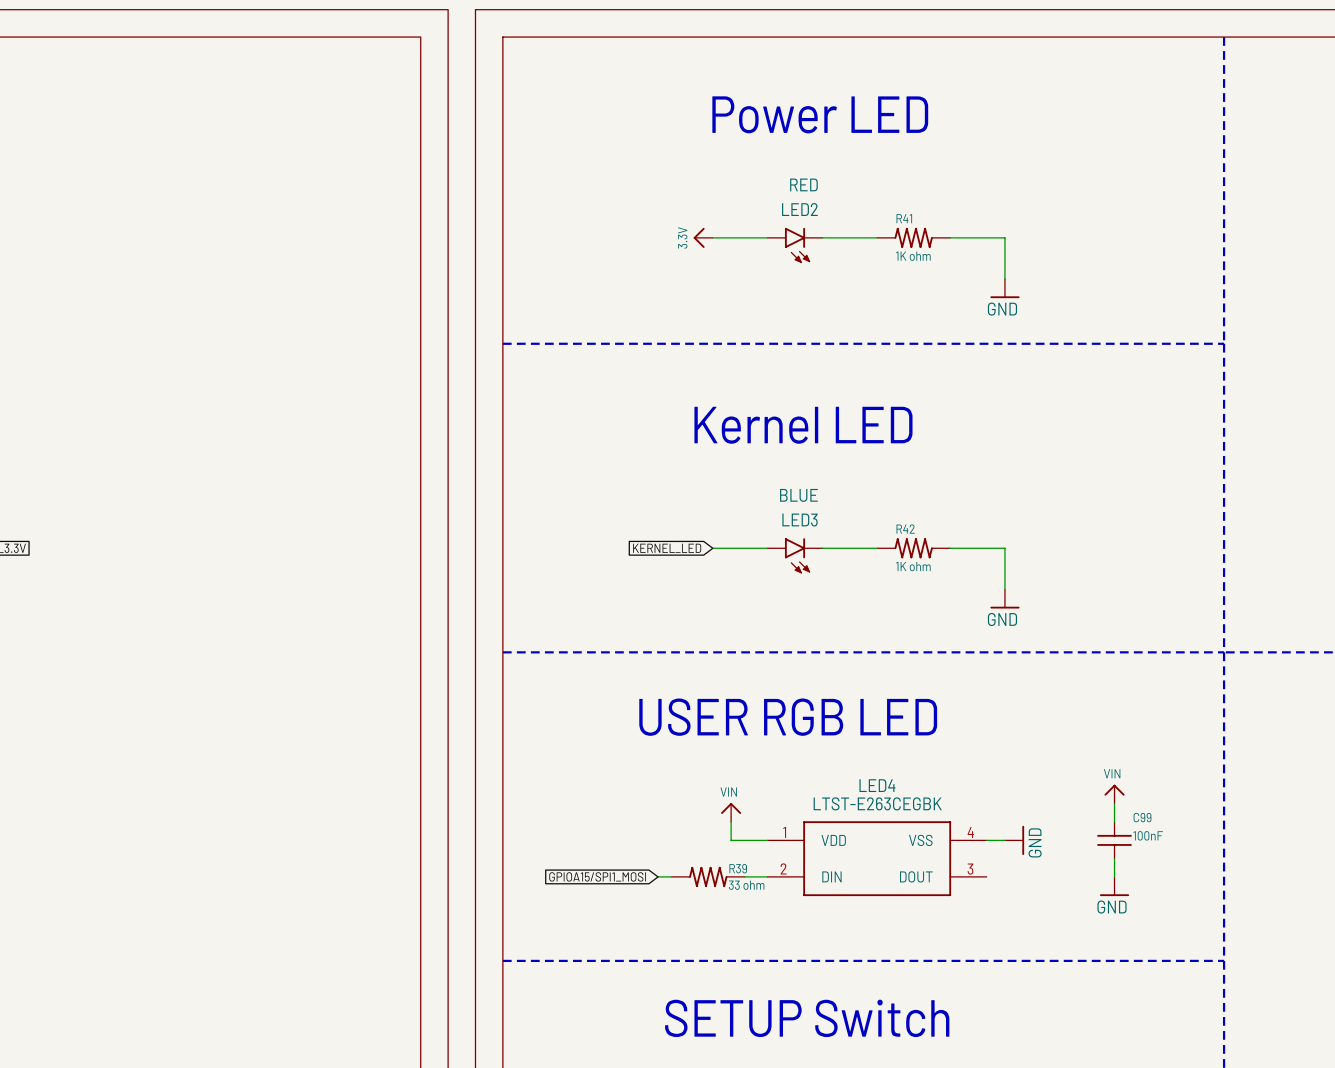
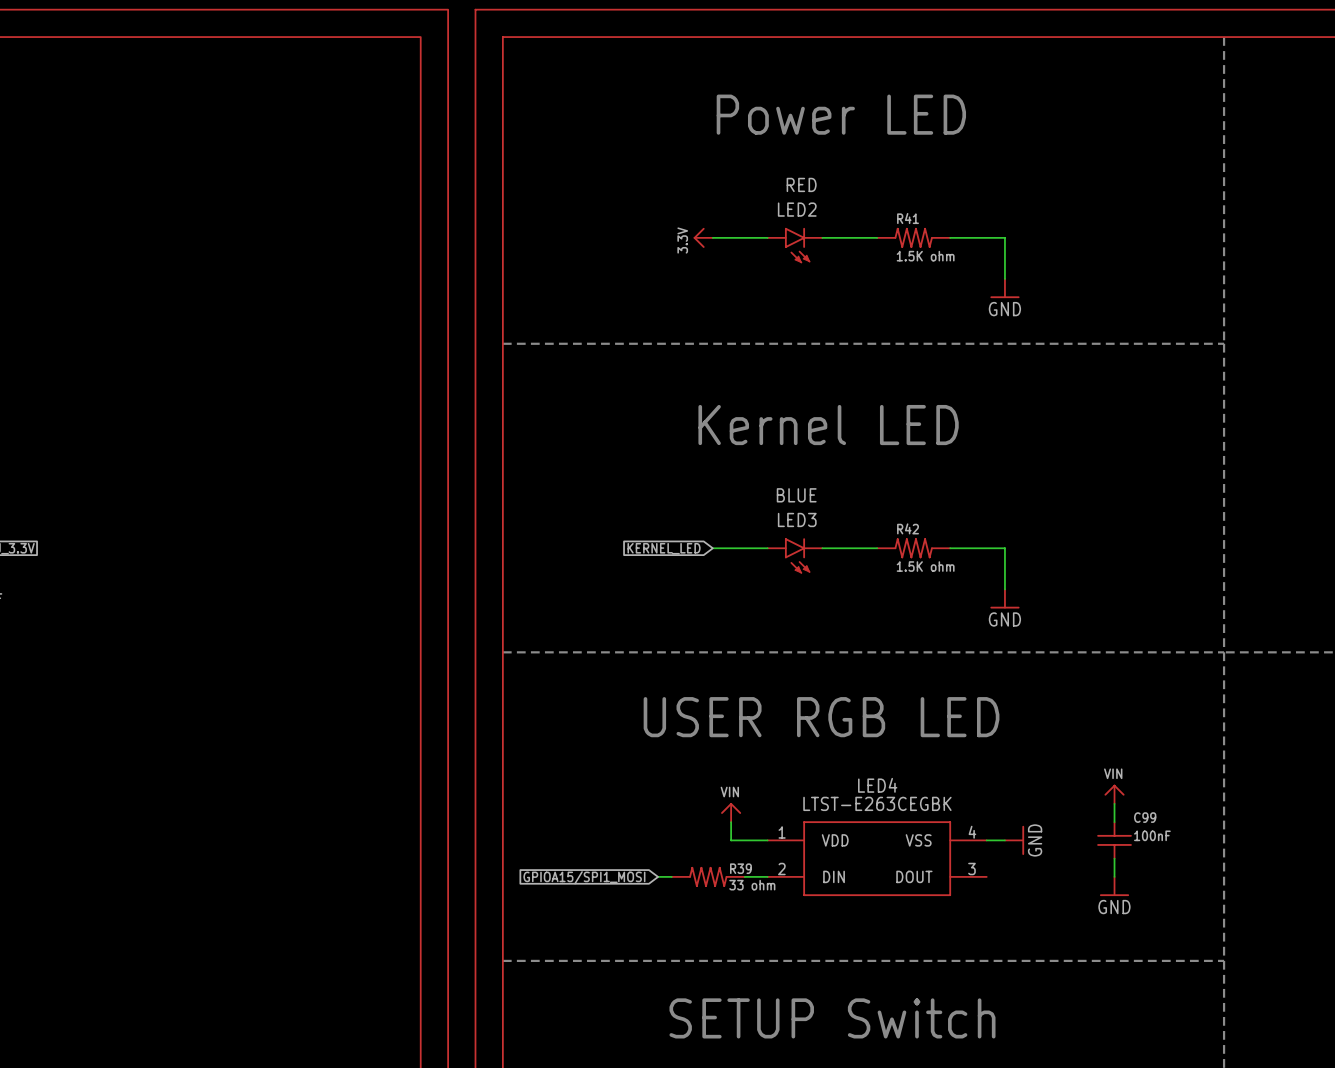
R41 value: 1K ohm (913, 256) -> 1.5K ohm (925, 256)
R42 value: 1K ohm (913, 566) -> 1.5K ohm (925, 566)

